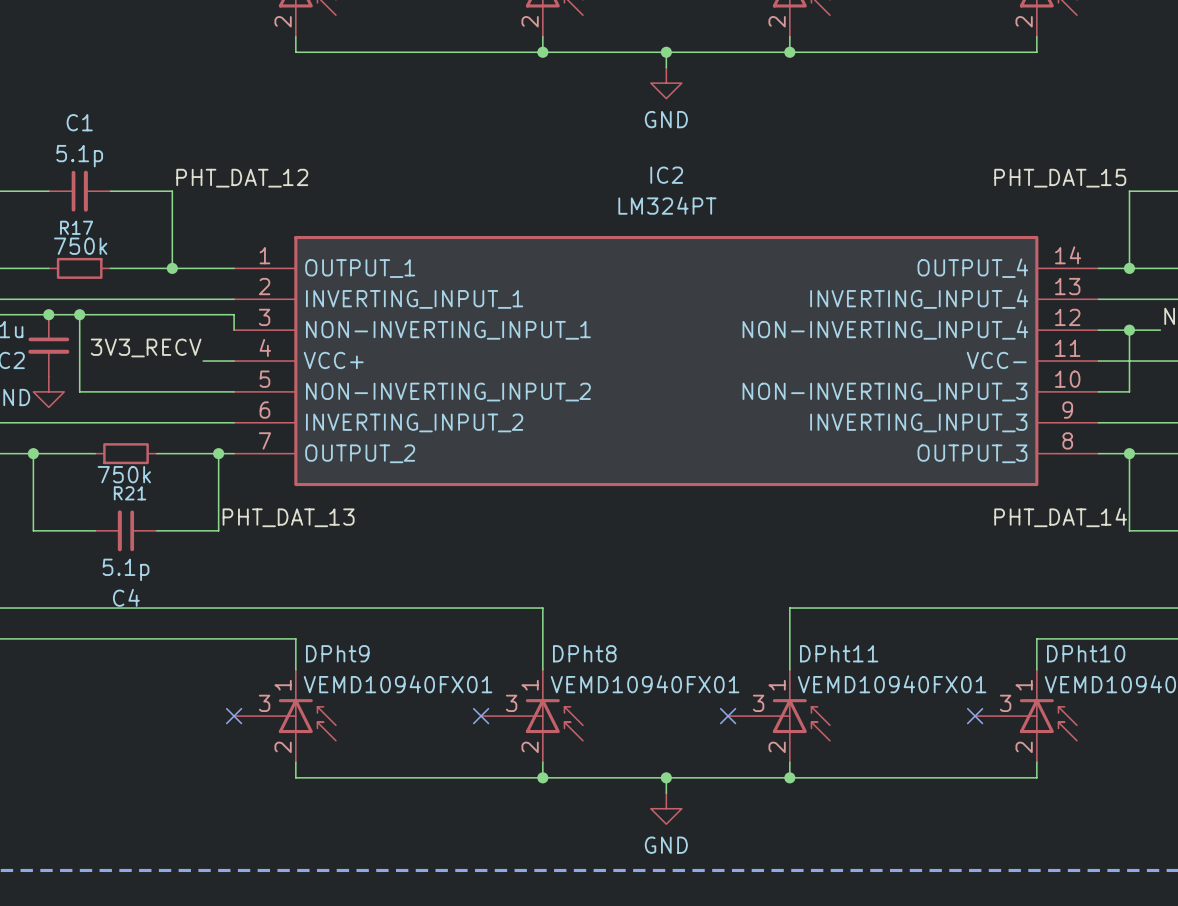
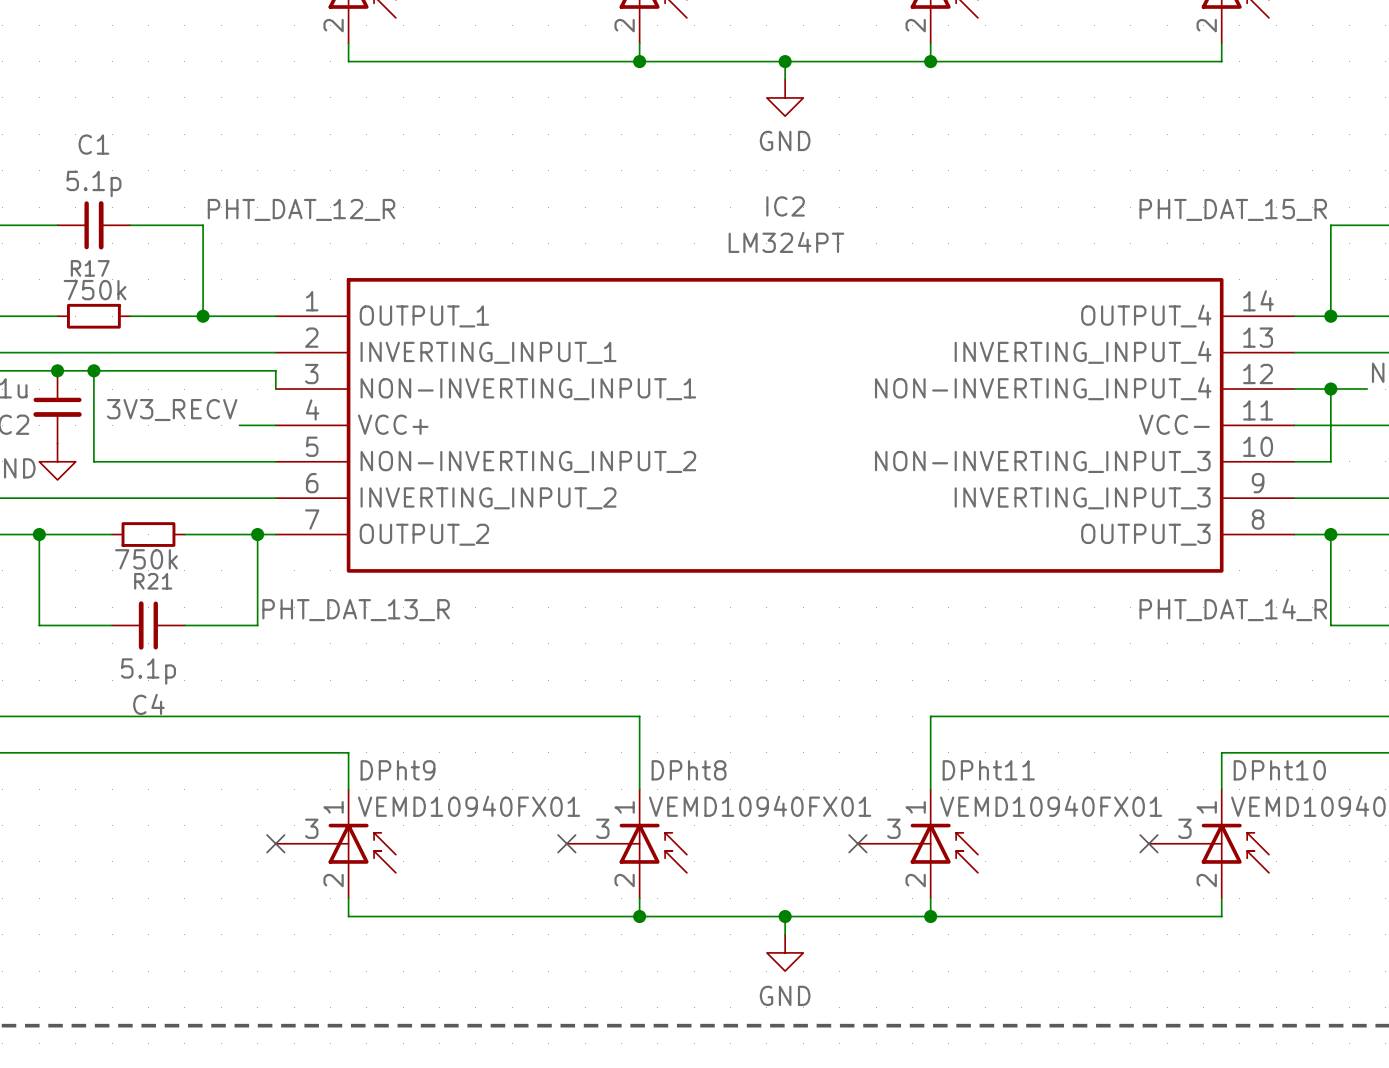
label: PHT_DAT_12 (242, 178) -> PHT_DAT_12_R (301, 209)
label: PHT_DAT_15 (1060, 178) -> PHT_DAT_15_R (1233, 209)
label: PHT_DAT_13 (288, 517) -> PHT_DAT_13_R (356, 610)
label: PHT_DAT_14 (1060, 517) -> PHT_DAT_14_R (1233, 609)

